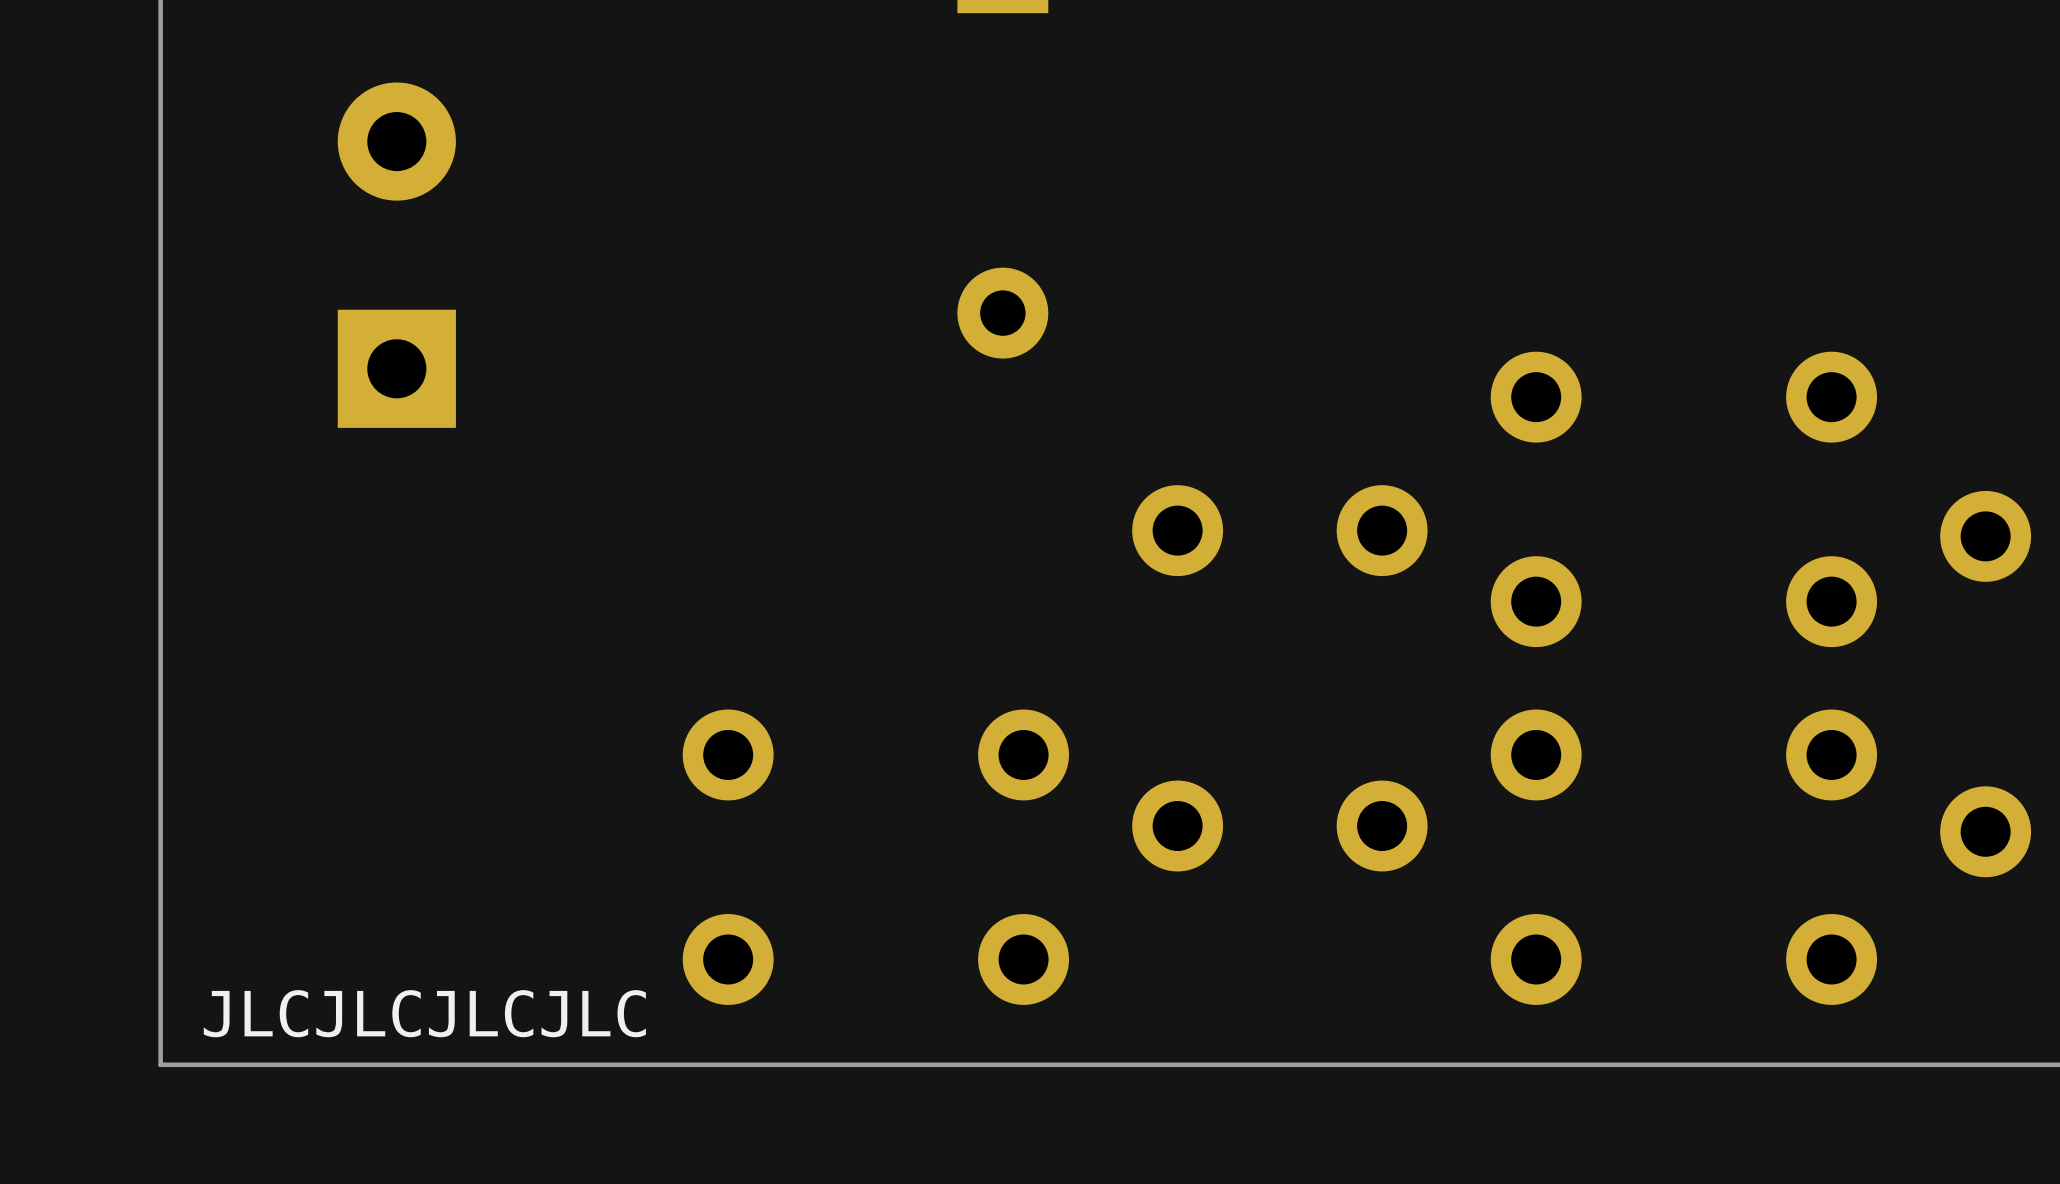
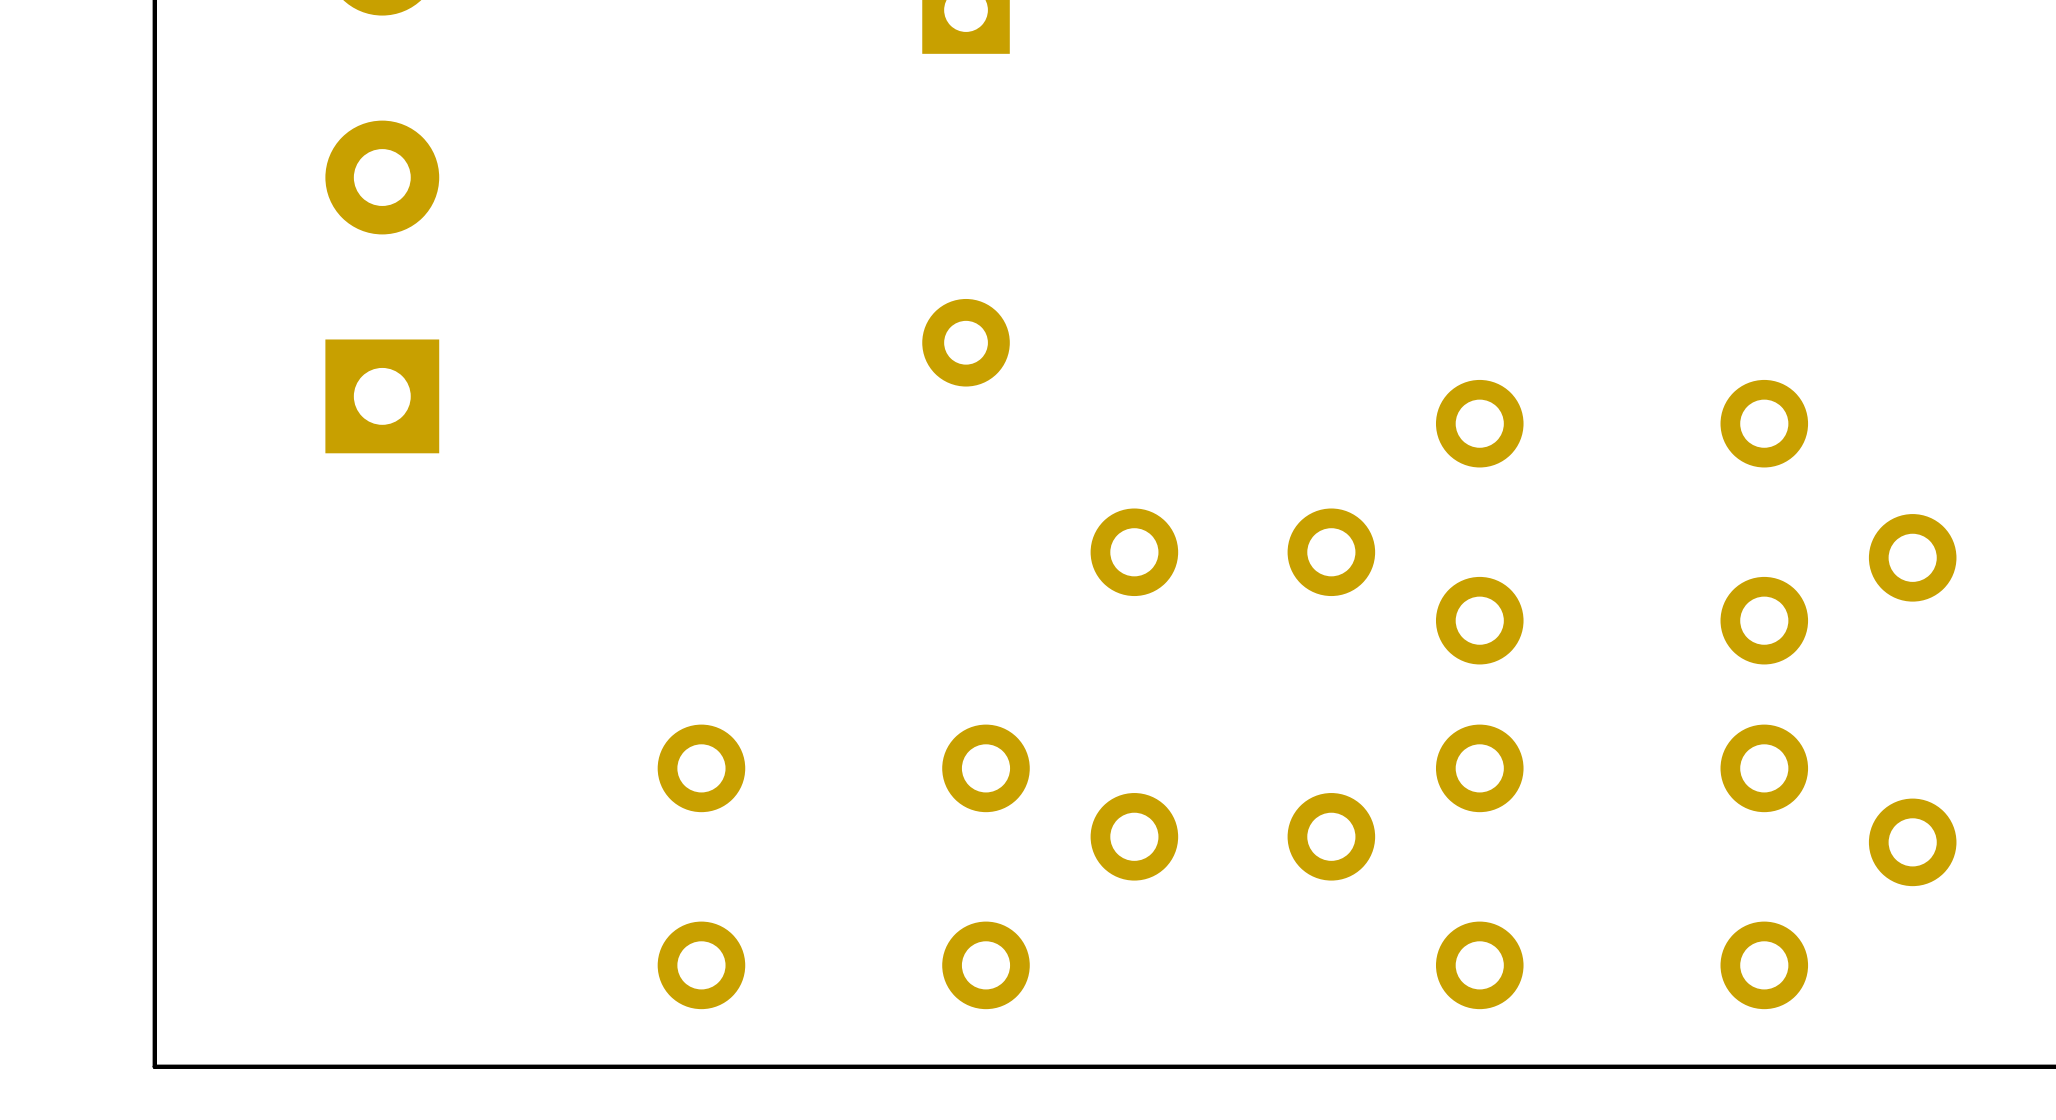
text: JLCJLCJLCJLC (424, 1013) -> none

